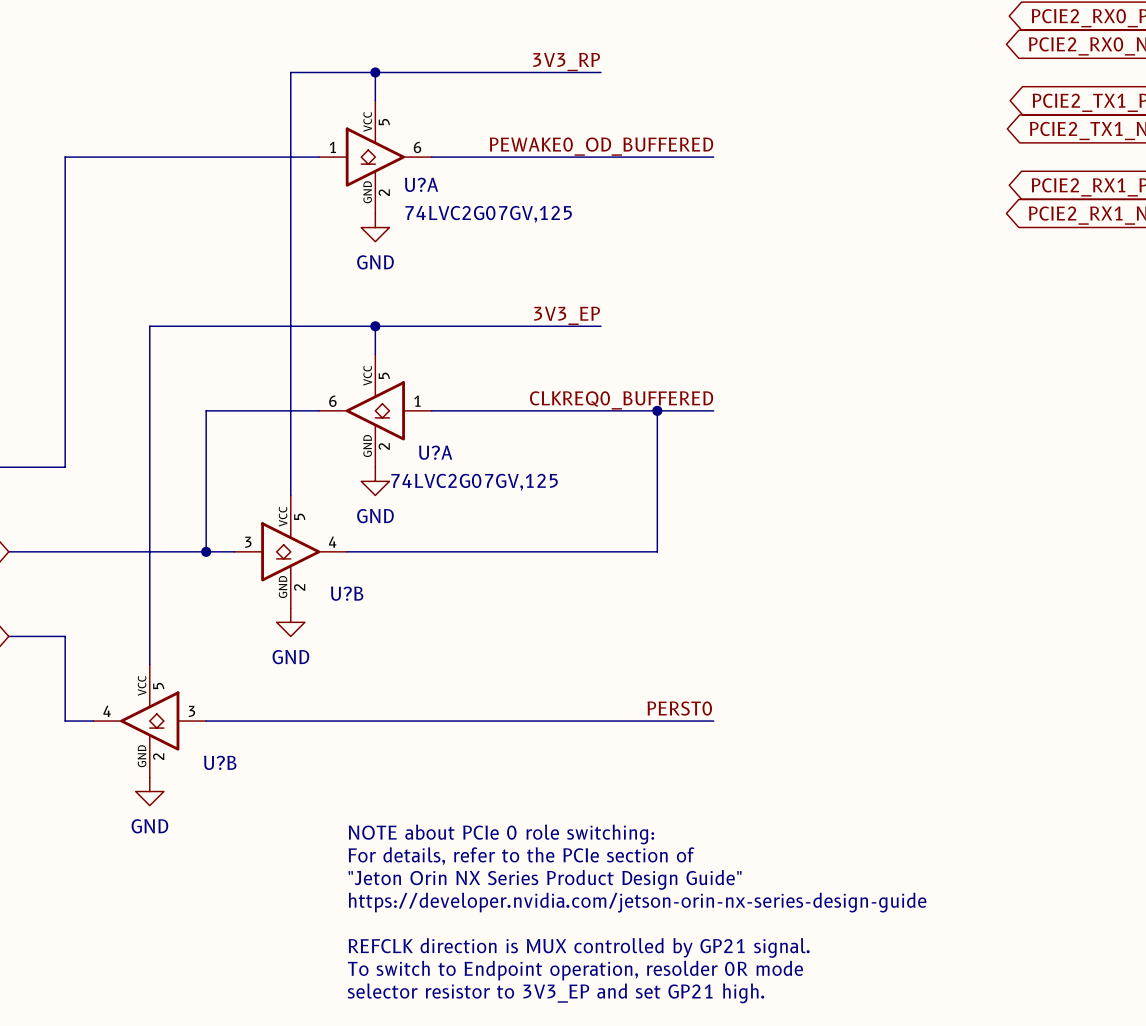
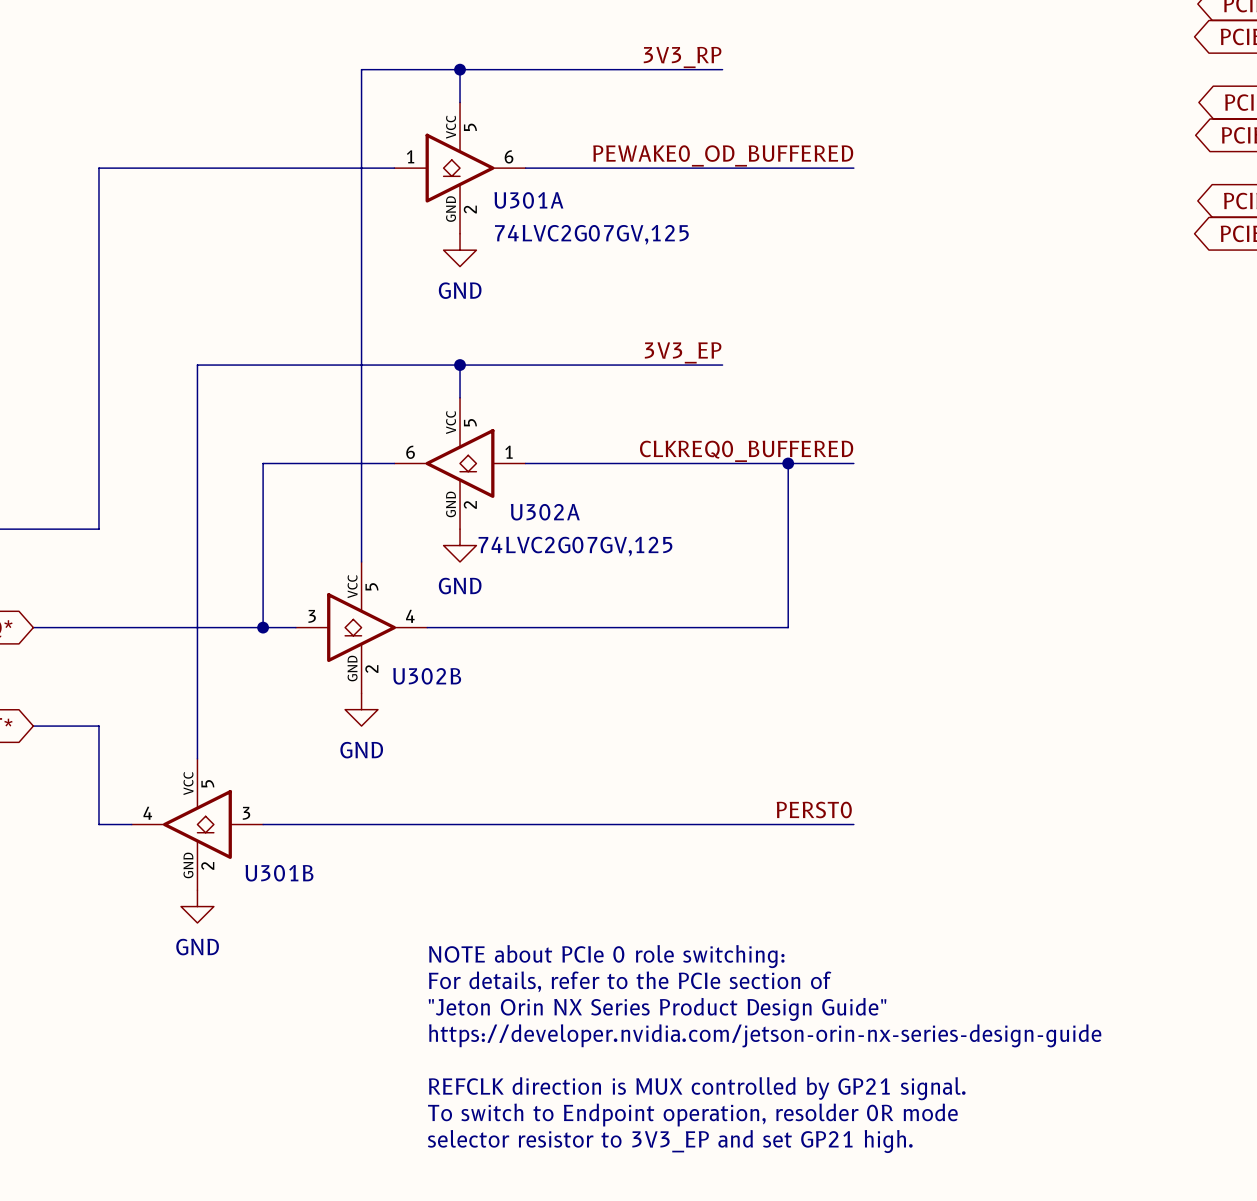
U?A name: U?A (421, 184) -> U301A (528, 200)
U?A name: U?A (435, 452) -> U302A (545, 512)
U?B name: U?B (347, 593) -> U302B (427, 676)
U?B name: U?B (220, 762) -> U301B (279, 873)

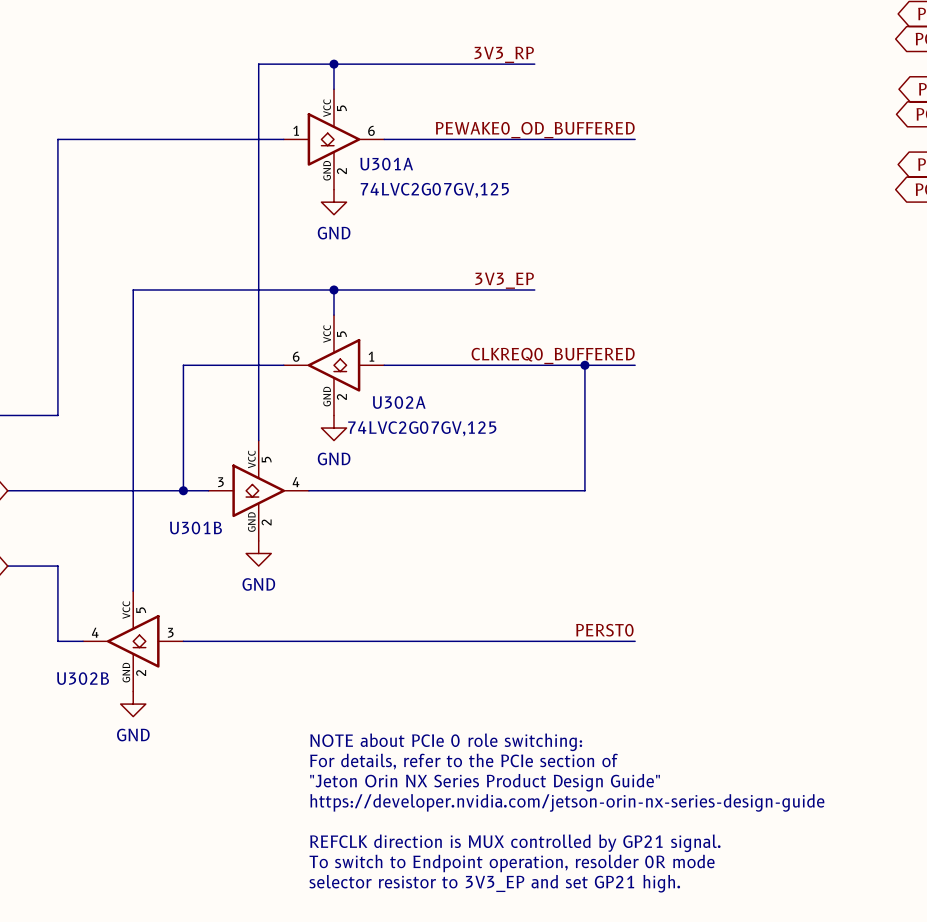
U302B name: U302B (427, 676) -> U301B (195, 528)
U301B name: U301B (279, 873) -> U302B (83, 678)

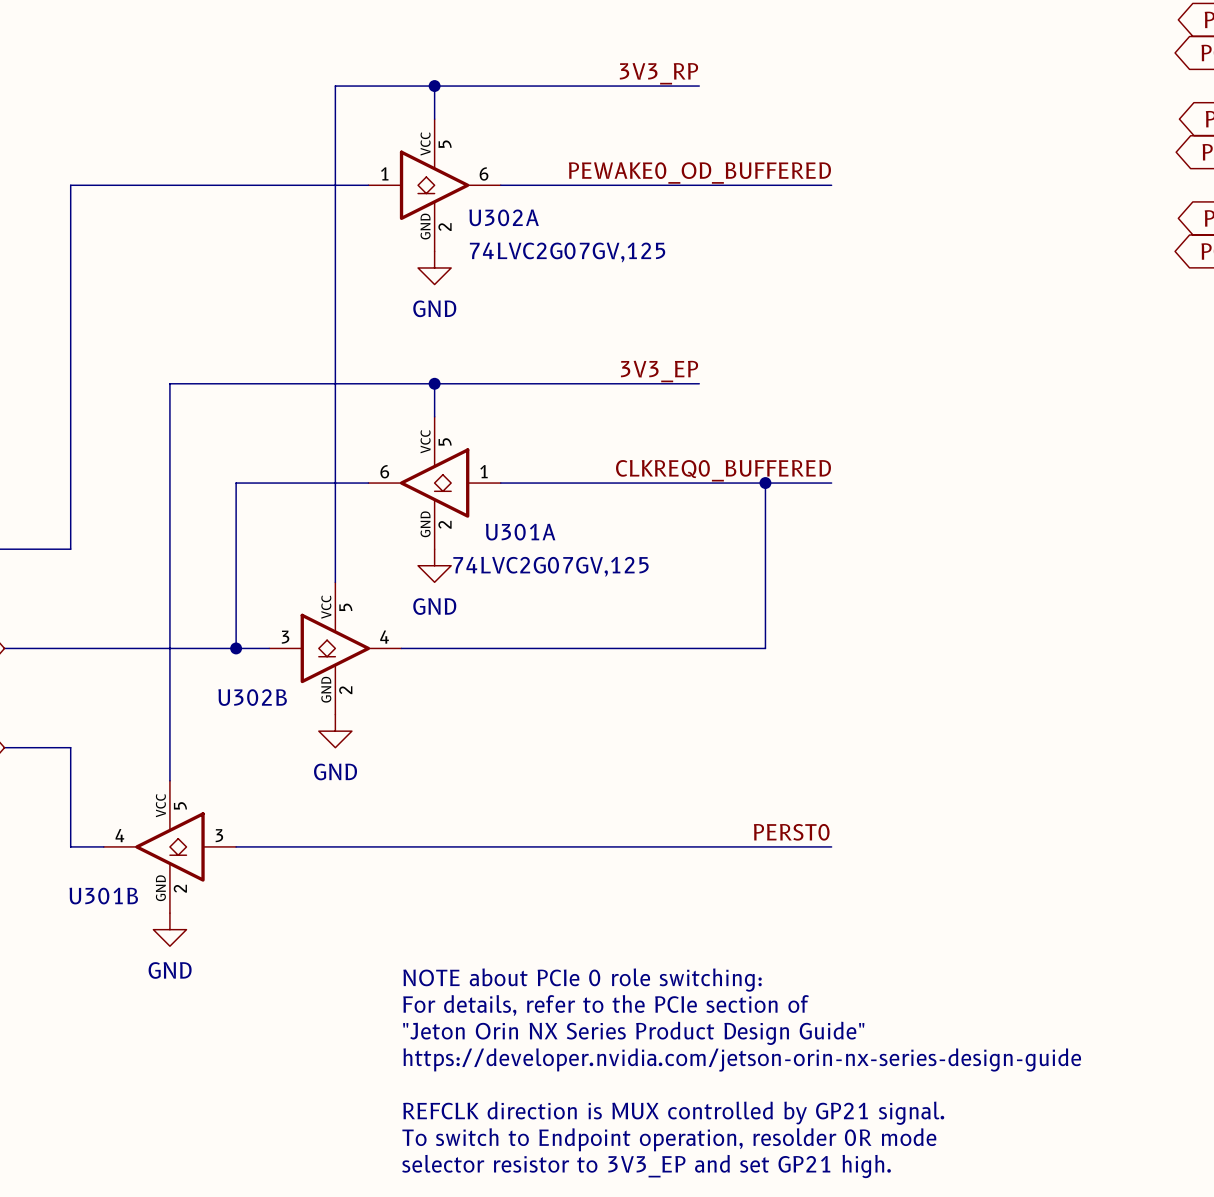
U301A name: U301A (386, 164) -> U302A (504, 217)
U302A name: U302A (399, 402) -> U301A (520, 532)
U301B name: U301B (195, 528) -> U302B (252, 697)
U302B name: U302B (83, 678) -> U301B (103, 896)

